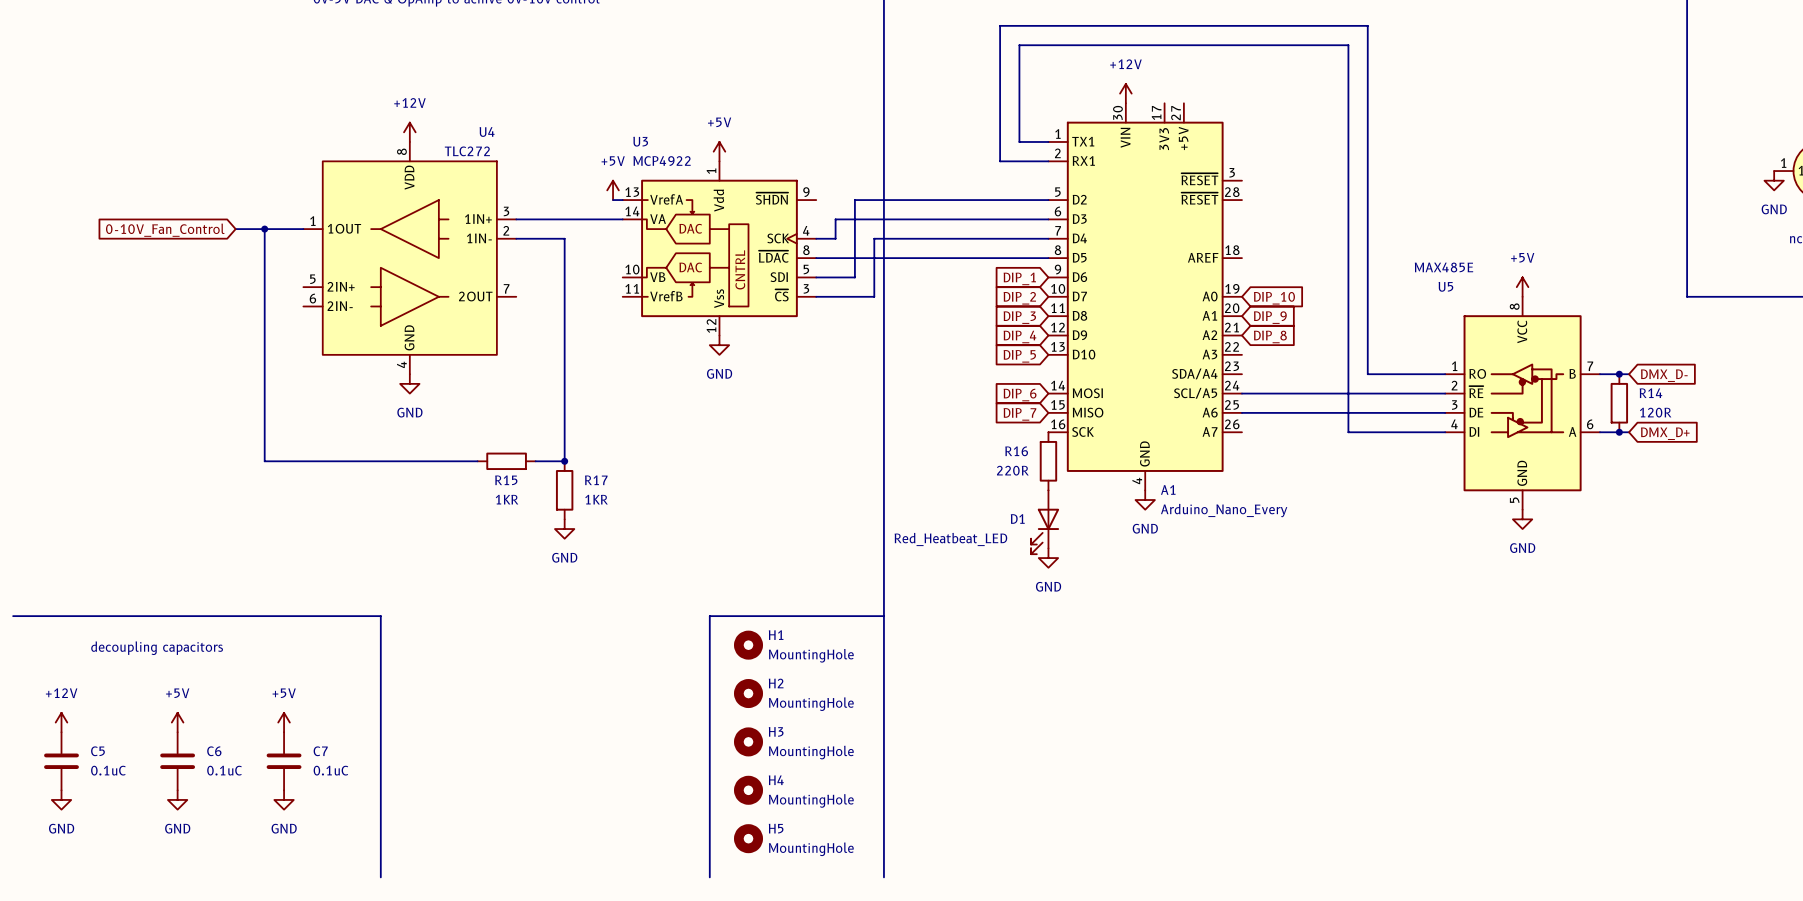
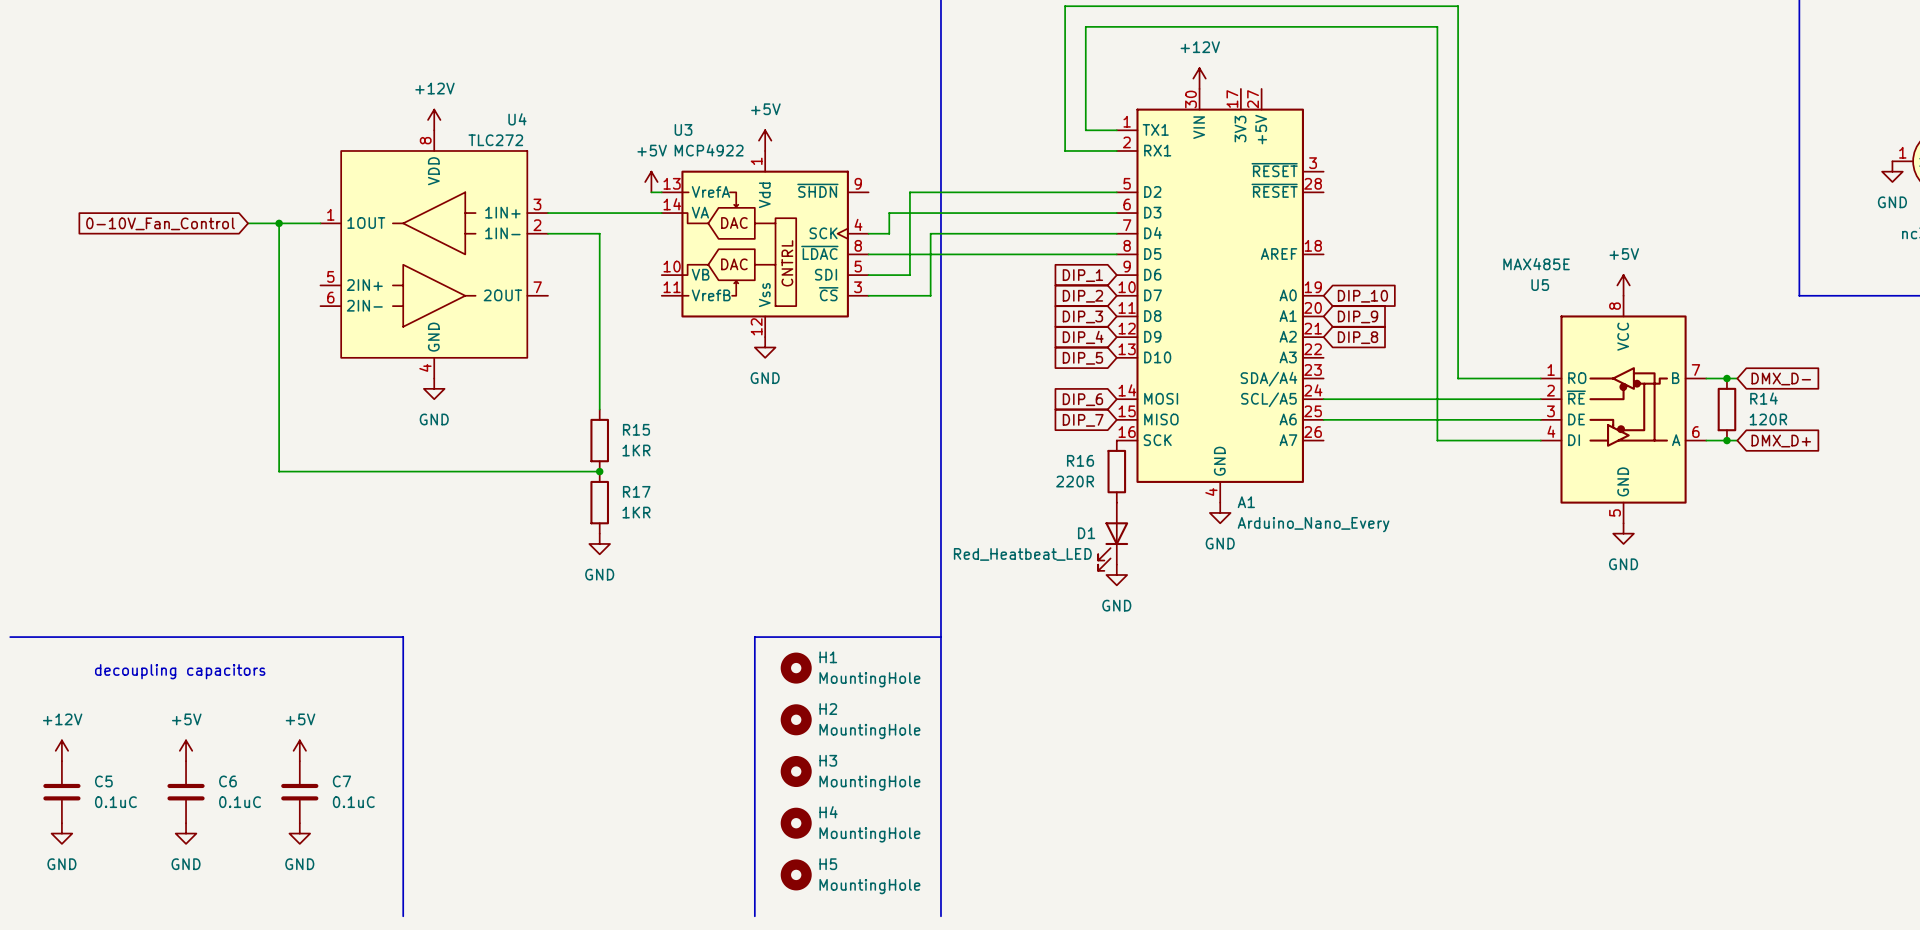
wire: (564, 403) (564, 461) -> none
wire: none -> (506, 471) (568, 471)
R15 rotation: 0° (506, 461) -> 90° clockwise (599, 440)
R15 position: (506, 461) -> (599, 440)
R15 name position: R15 (506, 480) -> R15 (636, 429)
R15 value position: 1KR (507, 499) -> 1KR (636, 450)

